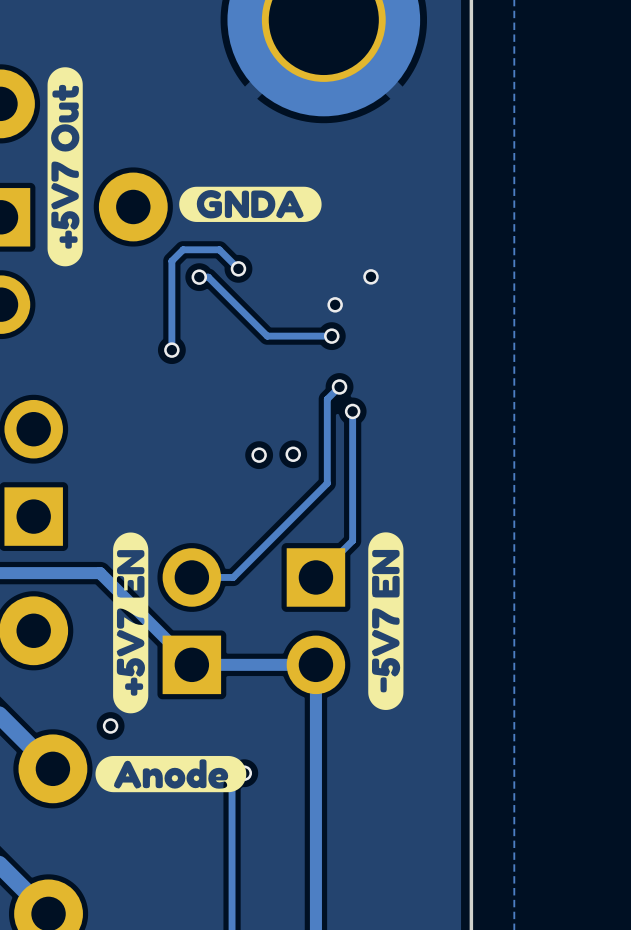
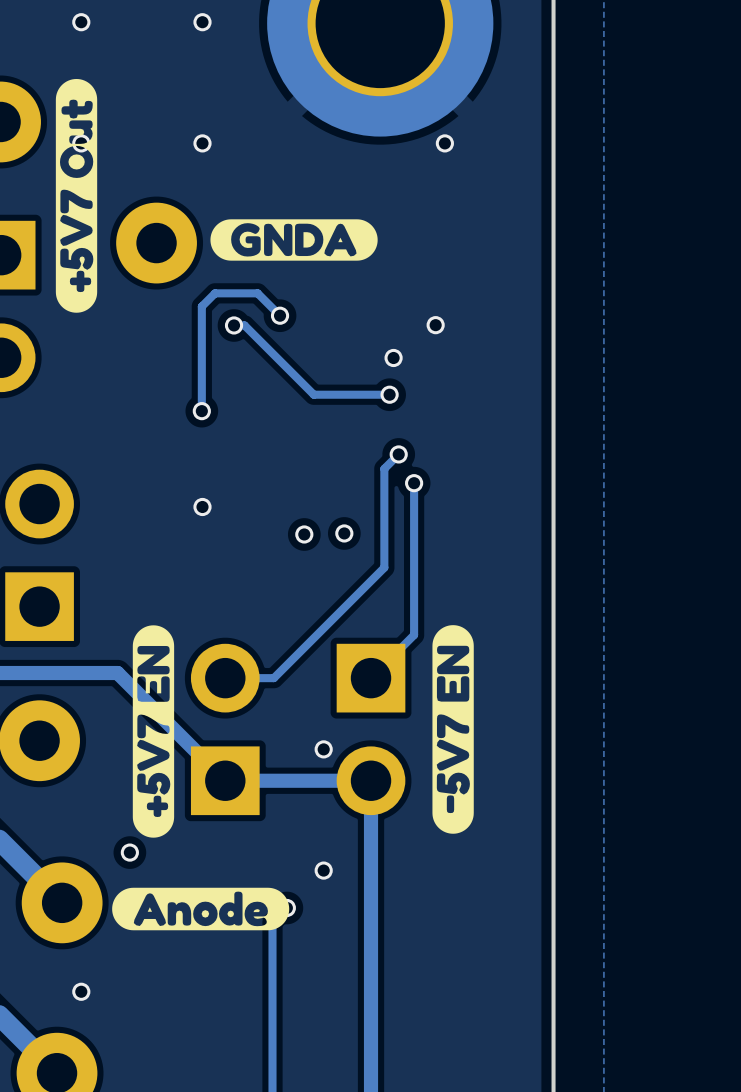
via: none -> (81, 22)
via: none -> (202, 22)
via: none -> (81, 143)
via: none -> (202, 143)
via: none -> (444, 143)
via: none -> (202, 506)
via: none -> (323, 749)
via: none -> (323, 870)
via: none -> (81, 991)

